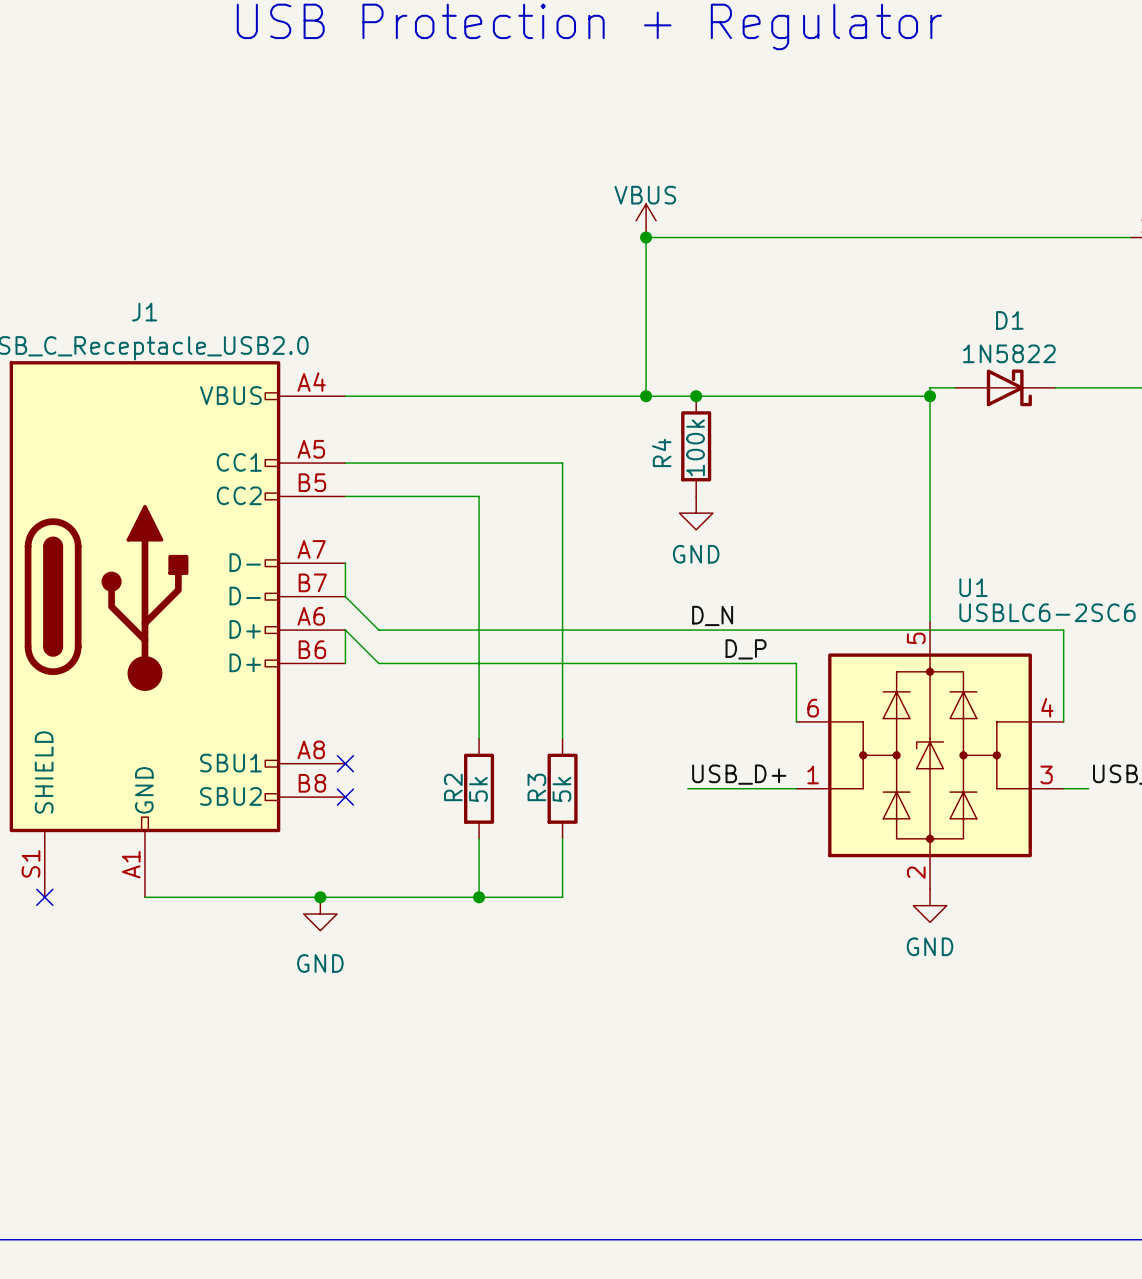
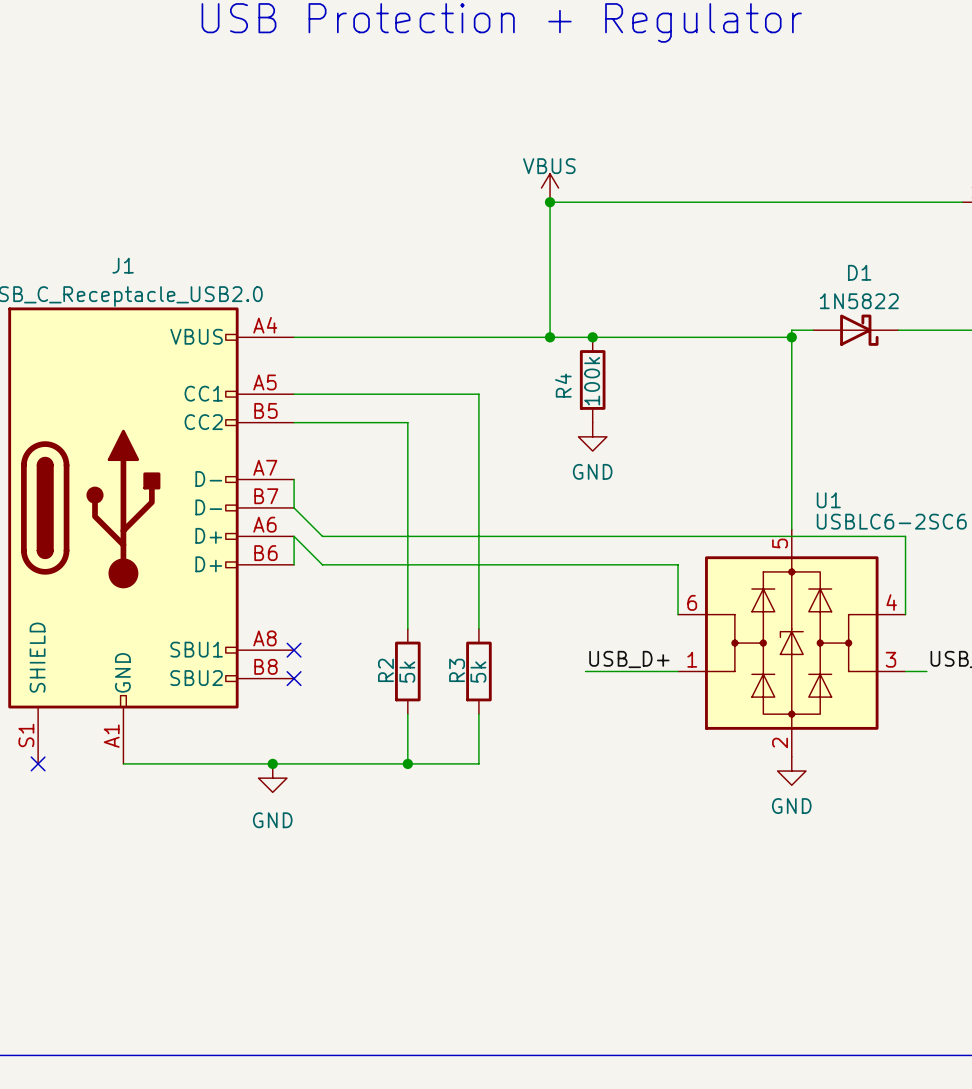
label: D_N (712, 615) -> none
label: D_P (746, 649) -> none

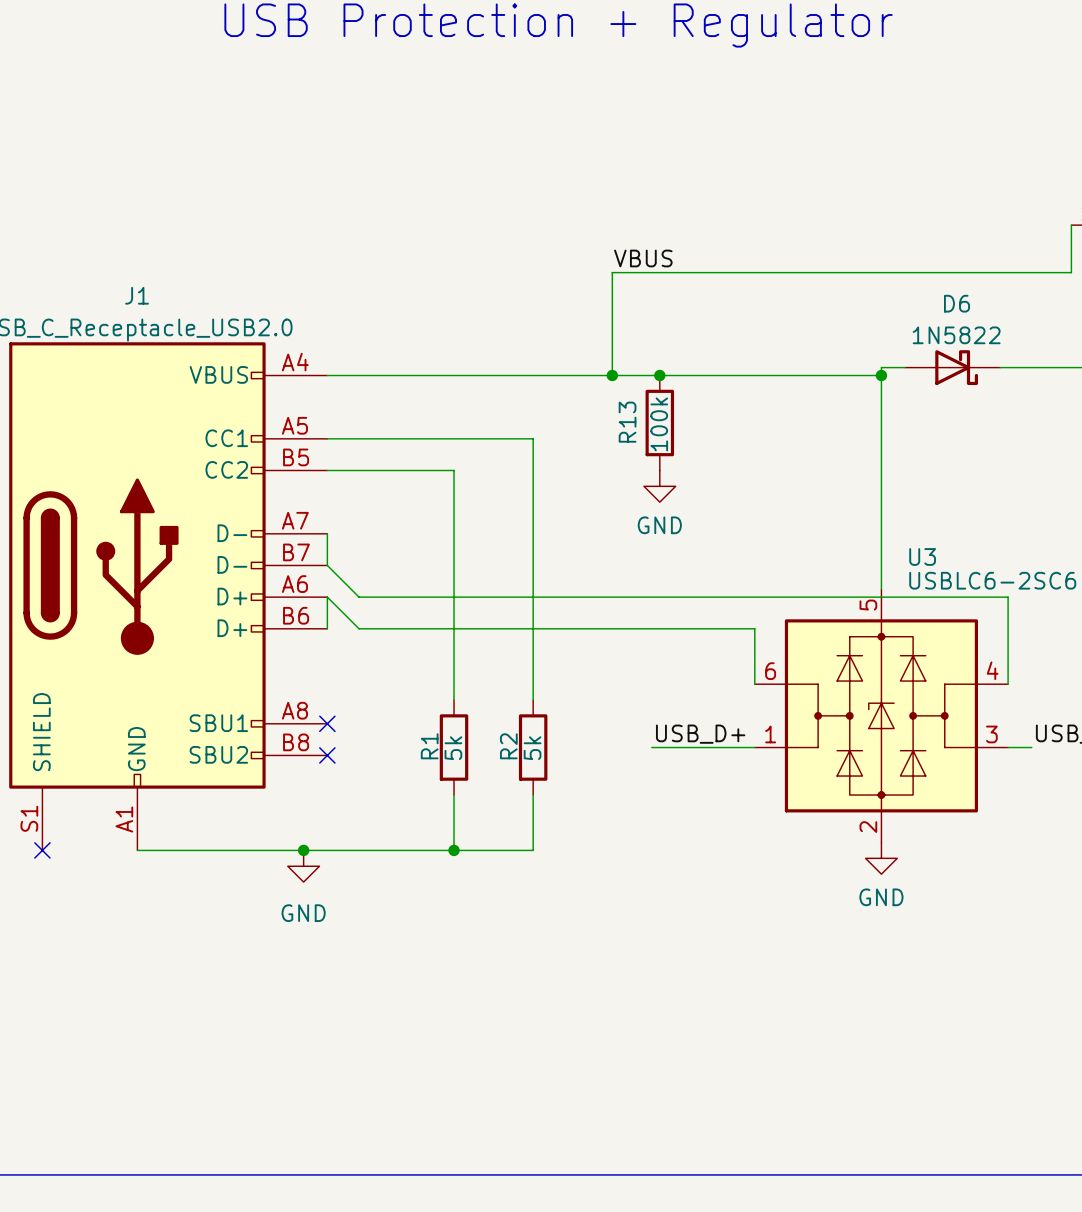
power symbol: VBUS (550, 188) -> none
junction: (550, 202) -> none
wire: (962, 202) (550, 202) (550, 244) -> (1071, 225) (1071, 272) (612, 272)
label: none -> VBUS (643, 258)
D1 name: D1 (859, 272) -> D6 (957, 303)
R4 name: R4 (563, 385) -> R13 (627, 422)
U1 name: U1 (828, 500) -> U3 (922, 556)
R2 name: R2 (385, 670) -> R1 (429, 746)
R3 name: R3 (457, 670) -> R2 (508, 746)

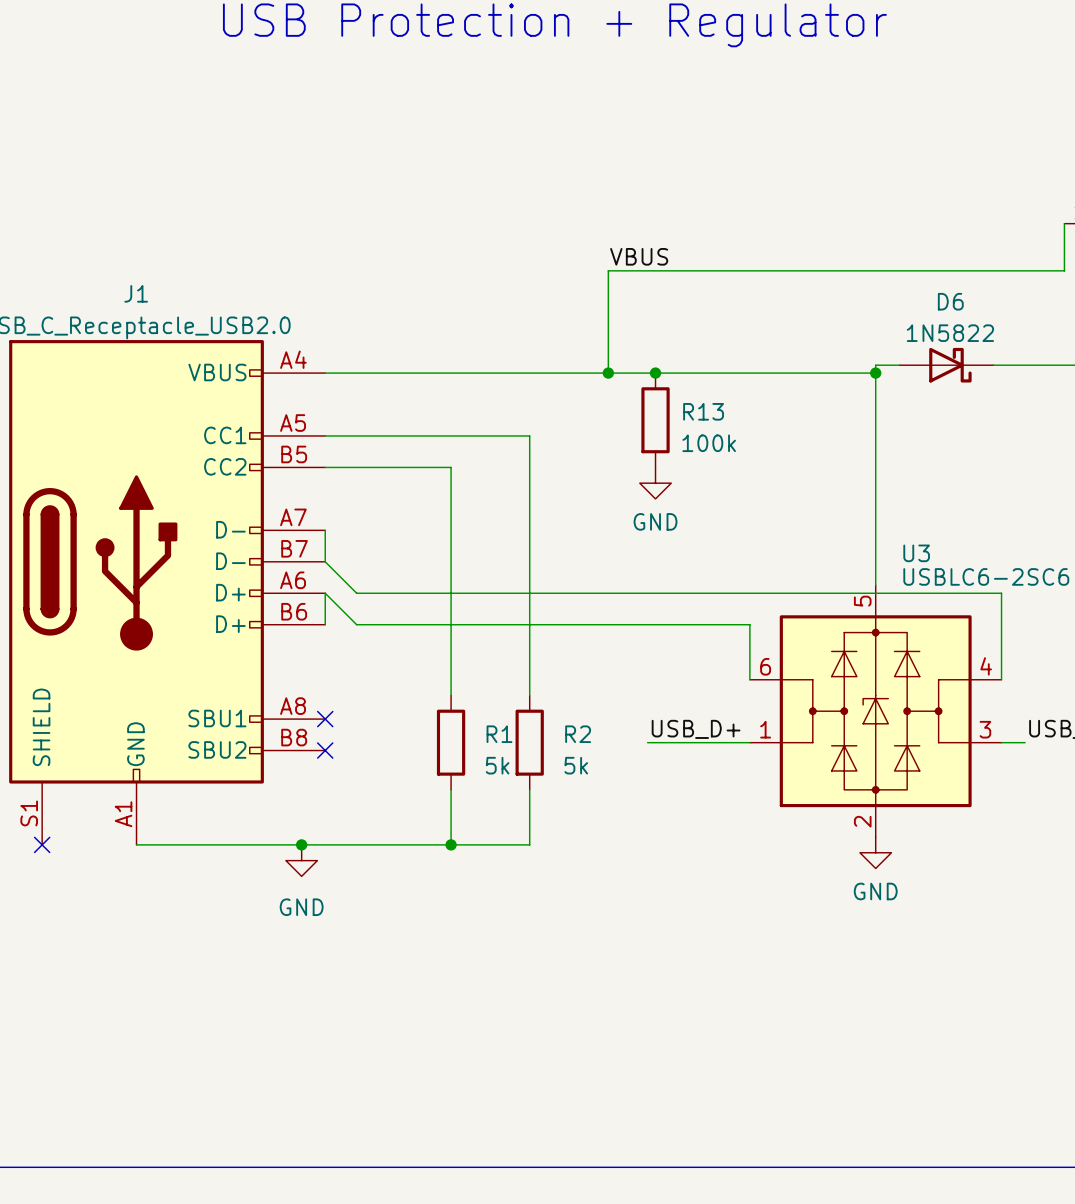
R13 name rotation: 0° (627, 422) -> 90° clockwise (703, 411)
R13 name position: R13 (627, 422) -> R13 (703, 411)
R13 value rotation: 0° (659, 424) -> 90° clockwise (709, 443)
R1 name rotation: 0° (429, 746) -> 90° clockwise (499, 734)
R1 name position: R1 (429, 746) -> R1 (499, 734)
R2 name rotation: 0° (508, 746) -> 90° clockwise (578, 734)
R2 name position: R2 (508, 746) -> R2 (578, 734)
R1 value rotation: 0° (453, 748) -> 90° clockwise (497, 765)
R1 value position: 5k (453, 748) -> 5k (497, 765)
R2 value rotation: 0° (532, 748) -> 90° clockwise (576, 765)
R2 value position: 5k (532, 748) -> 5k (576, 765)

